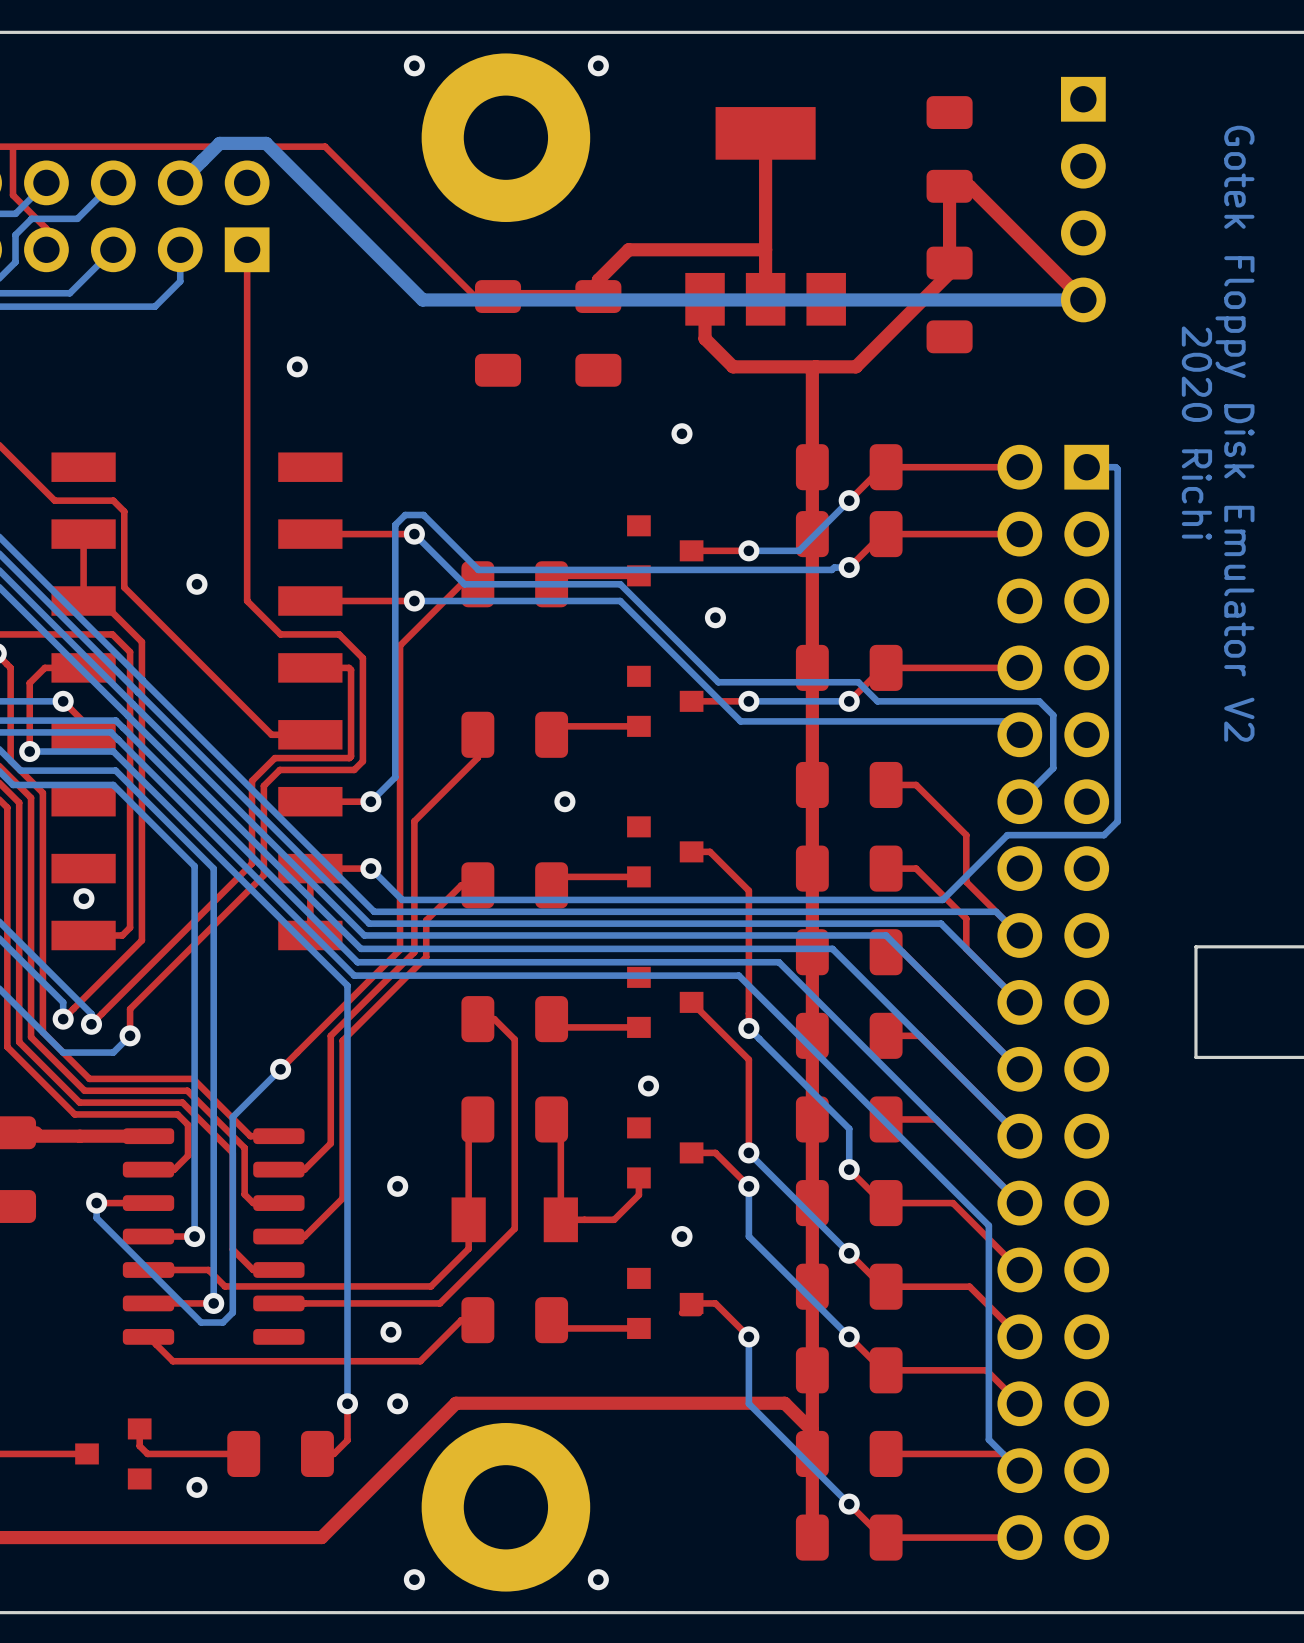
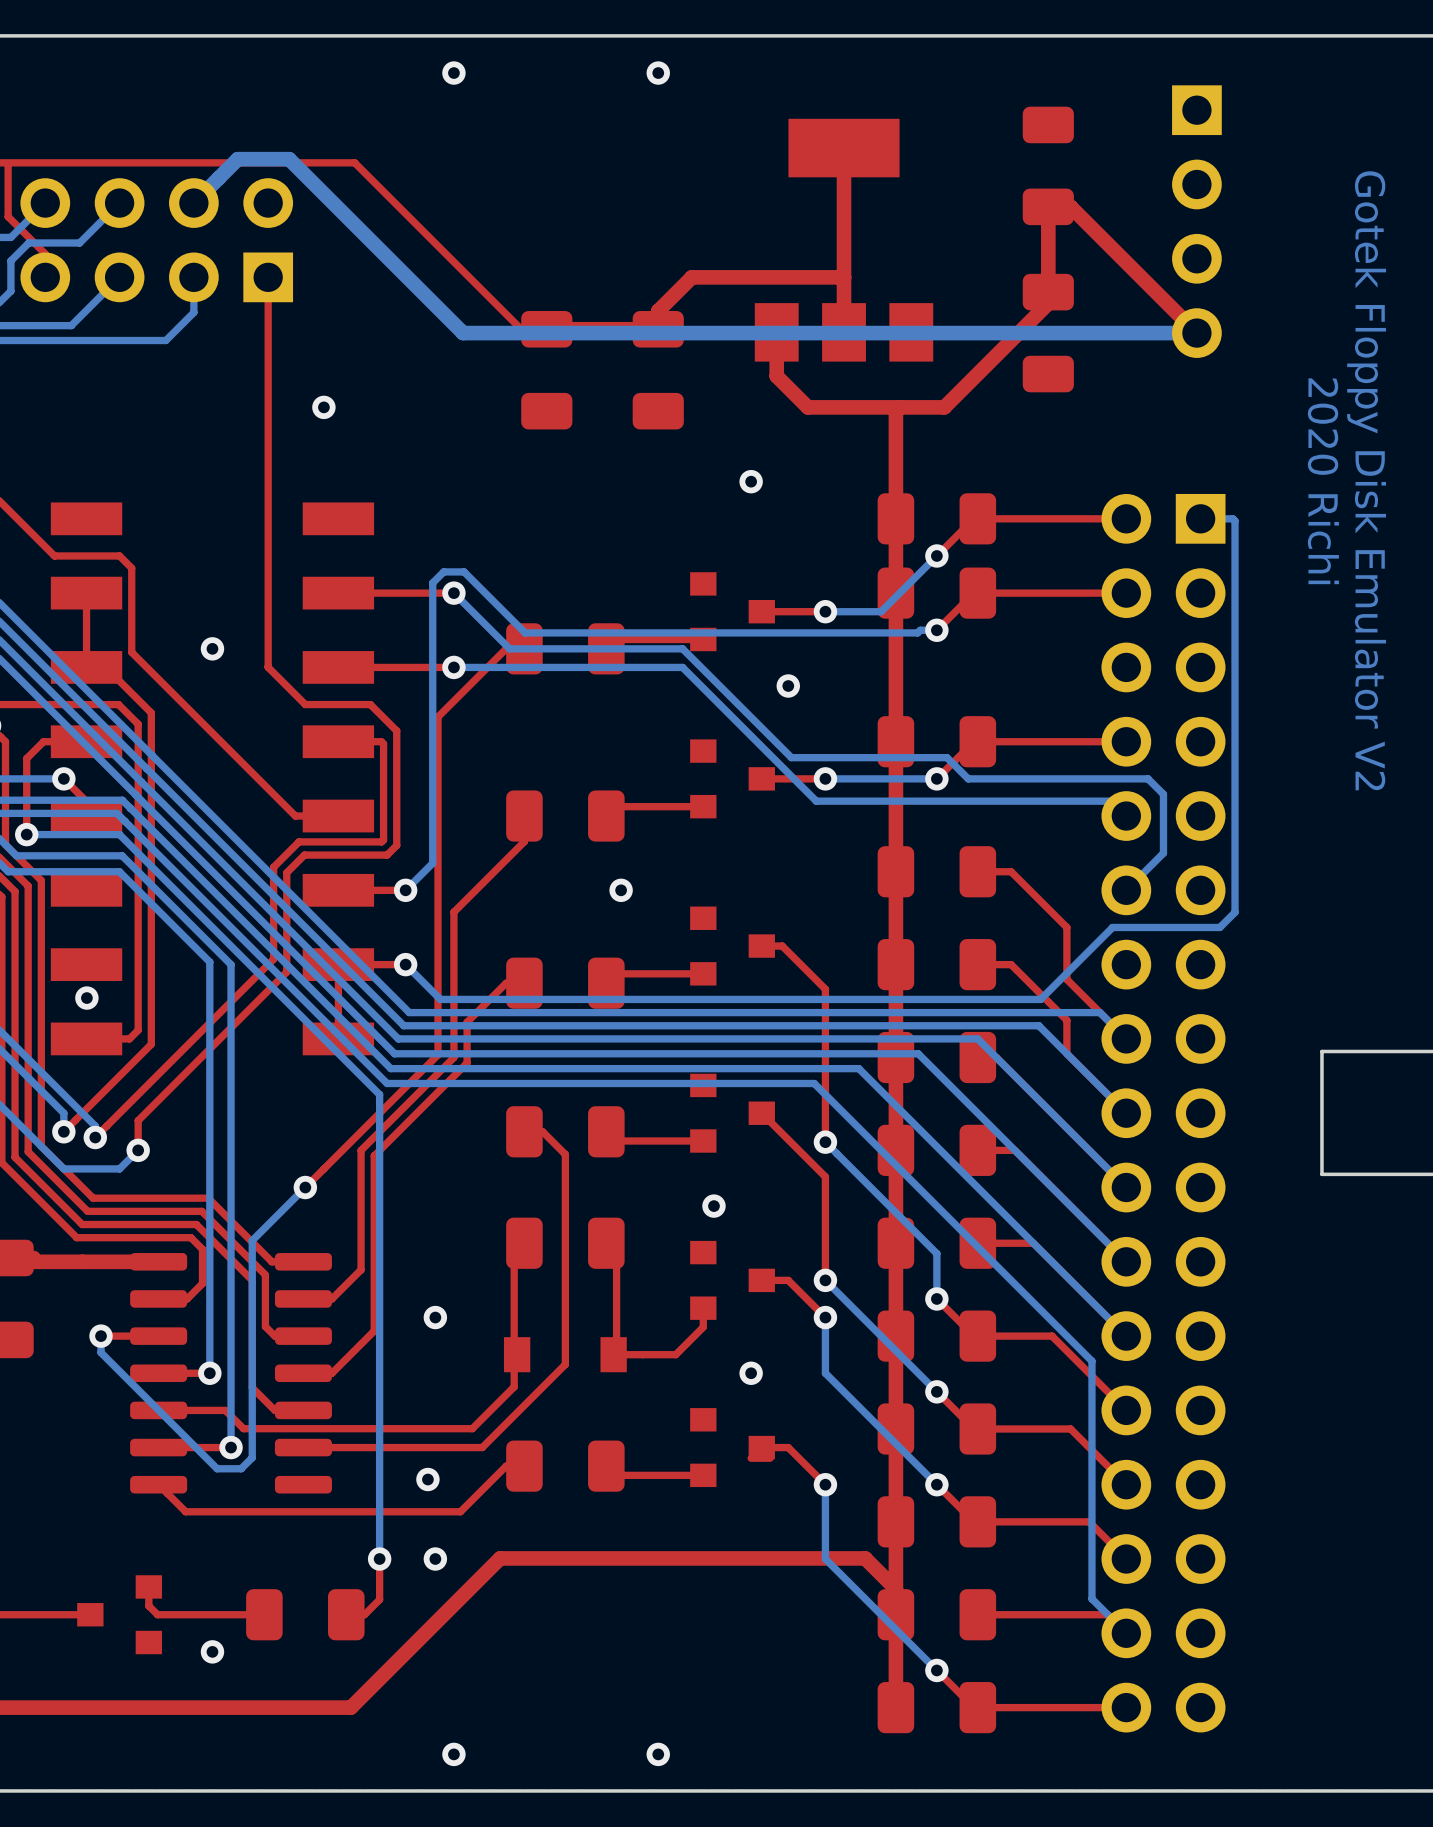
part: (505, 137) -> none
part footprint: [451, 1197, 578, 1243] -> [503, 1337, 627, 1373]
part: (505, 1507) -> none

